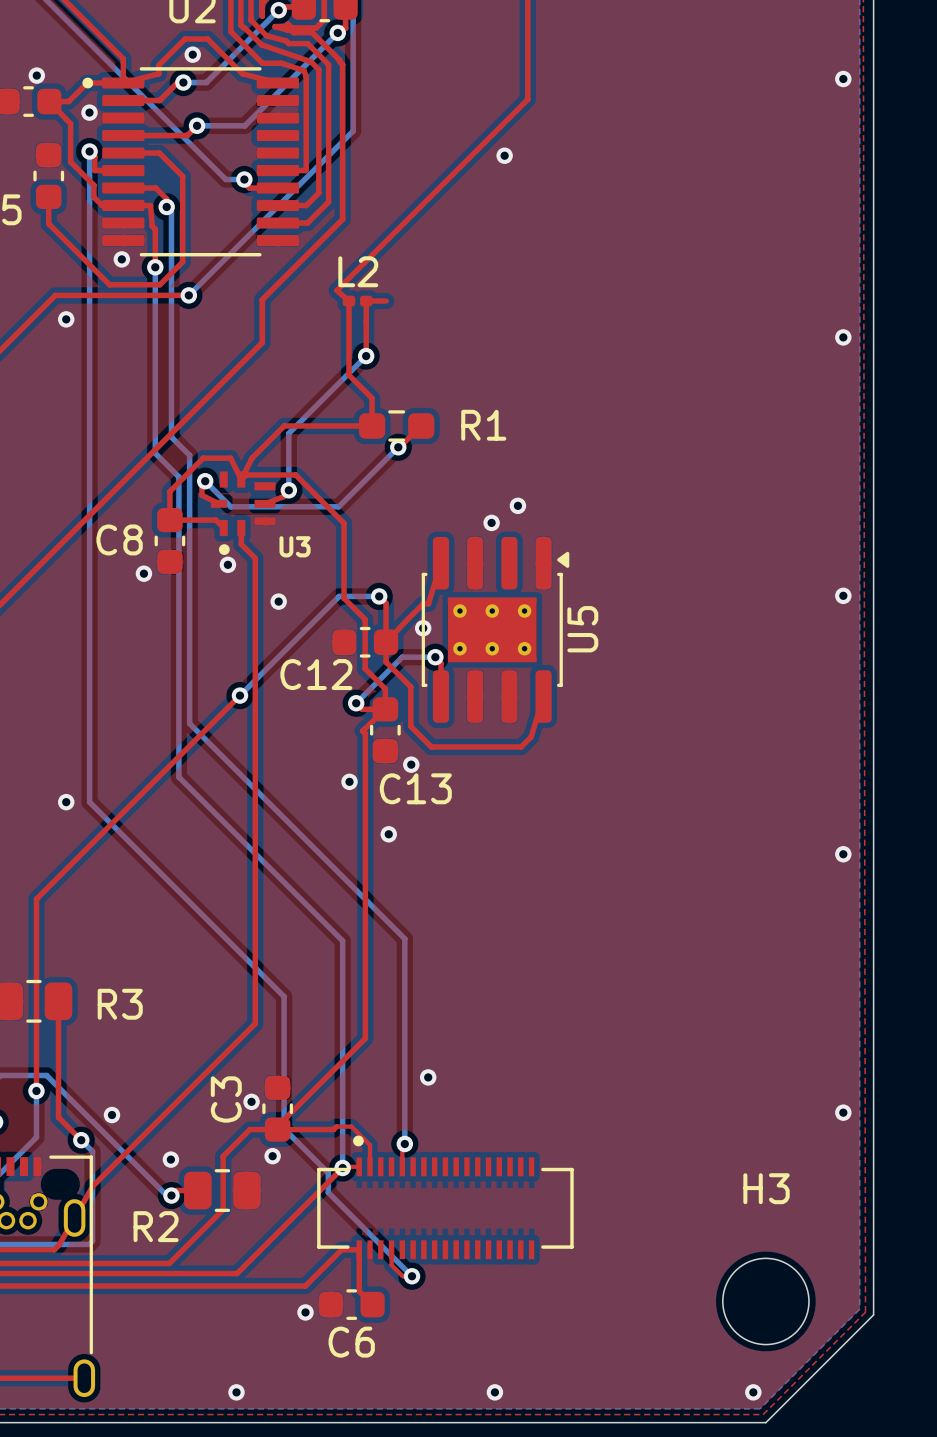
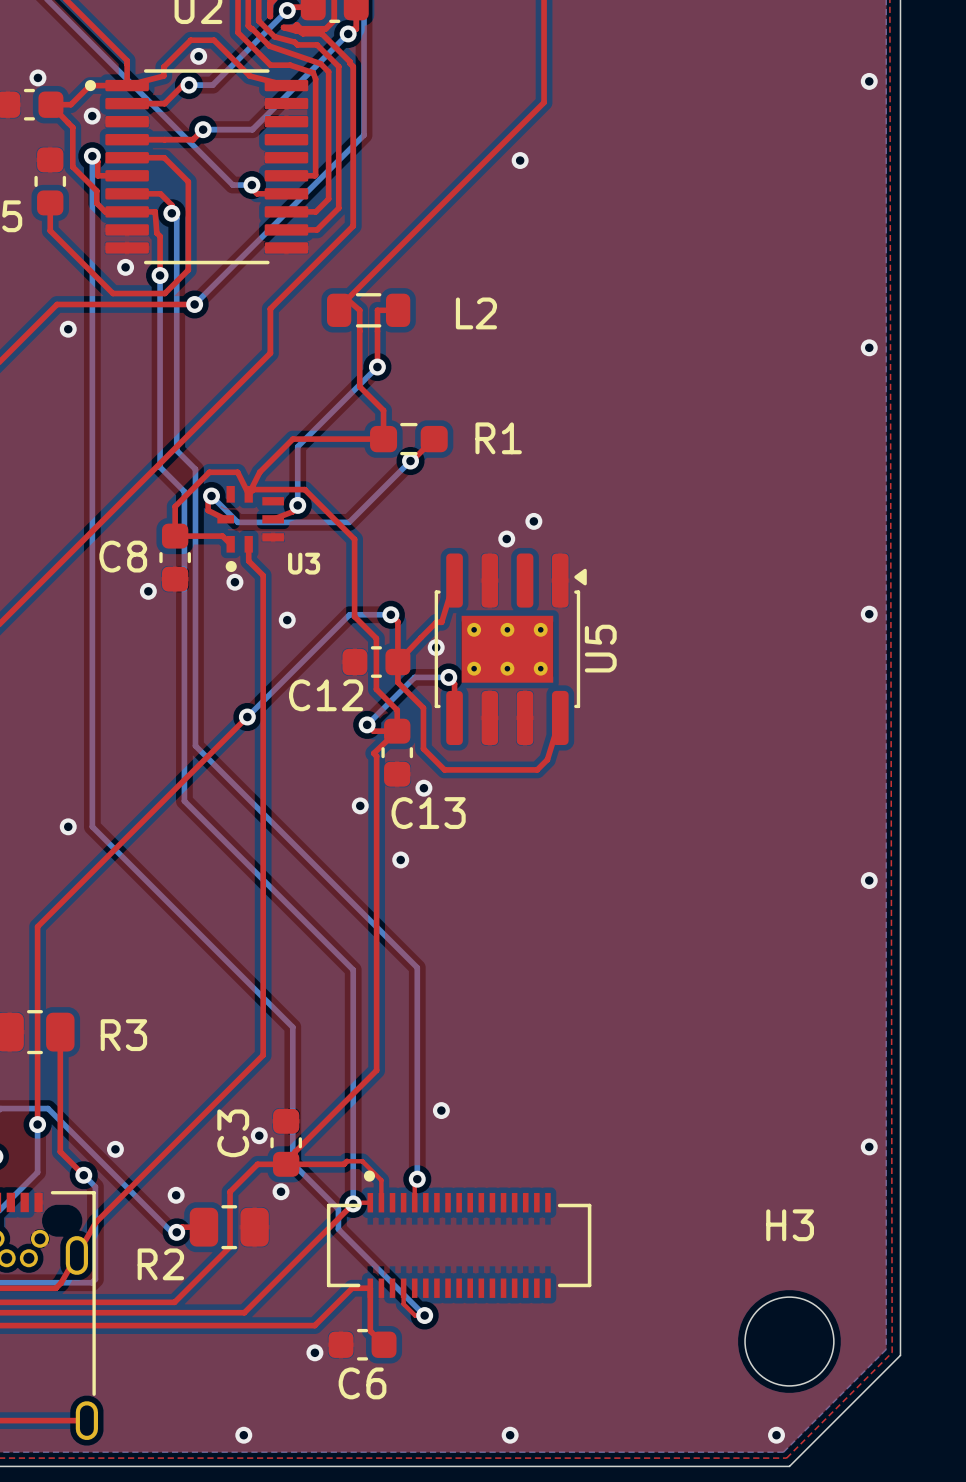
L2 name position: L2 (358, 271) -> L2 (476, 313)
L2 footprint: [342, 295, 373, 307] -> [326, 293, 411, 328]

